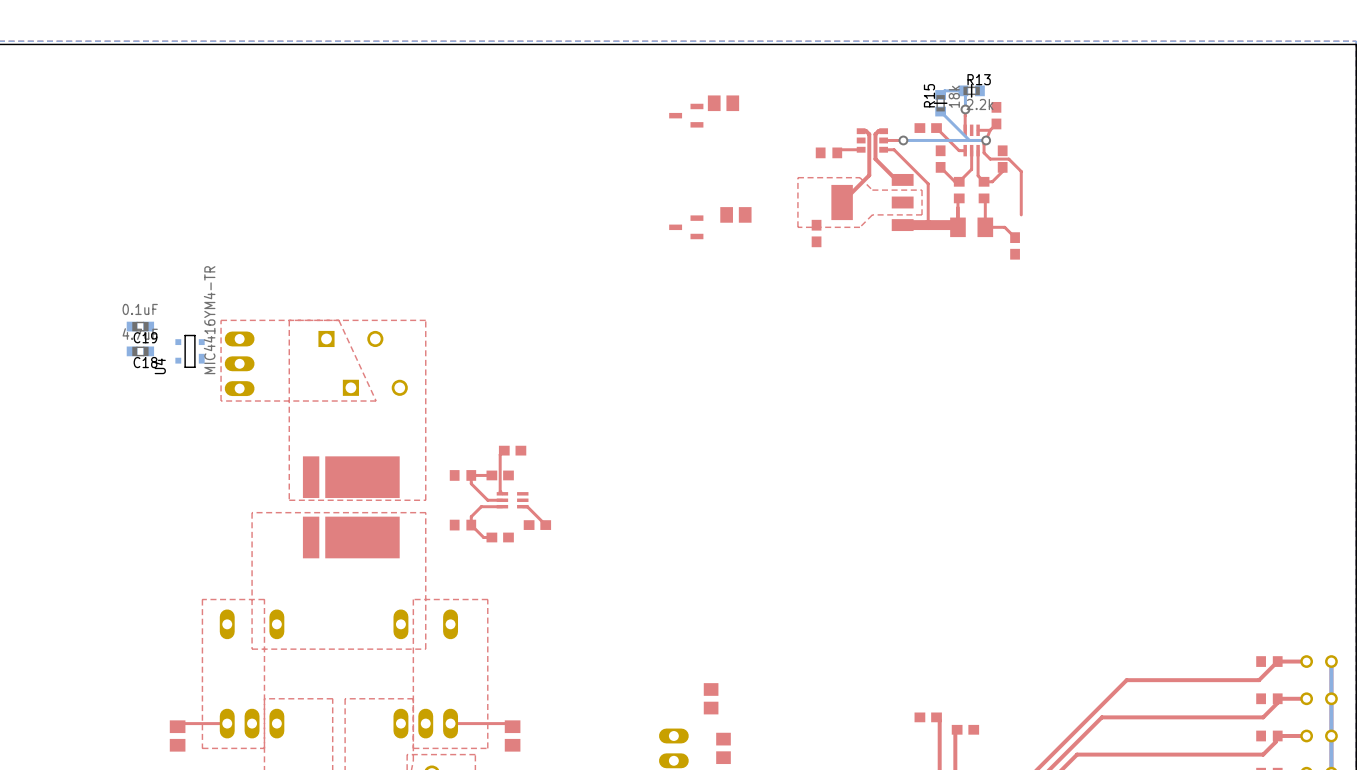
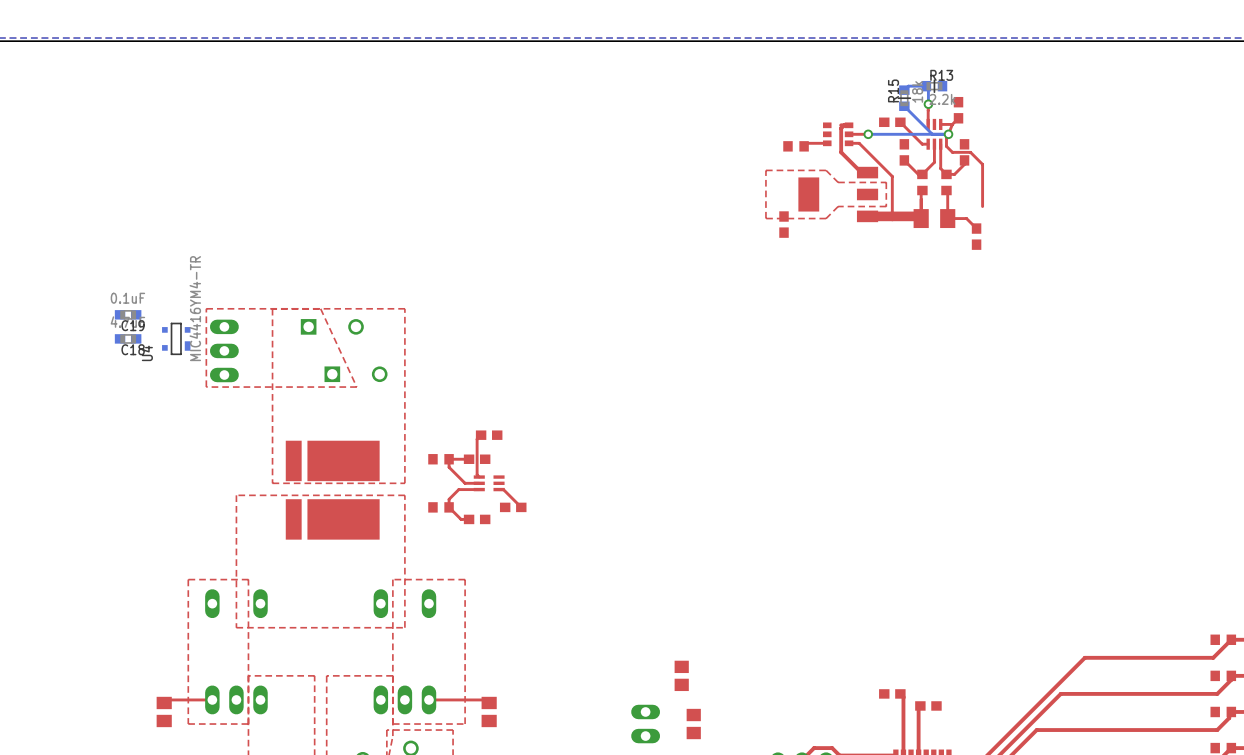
part: (723, 103) -> none
part: (686, 115) -> none
top track: (861, 131) (866, 131) (869, 134) (869, 175) (842, 202) -> none
part: (735, 214) -> none
part: (686, 227) -> none

